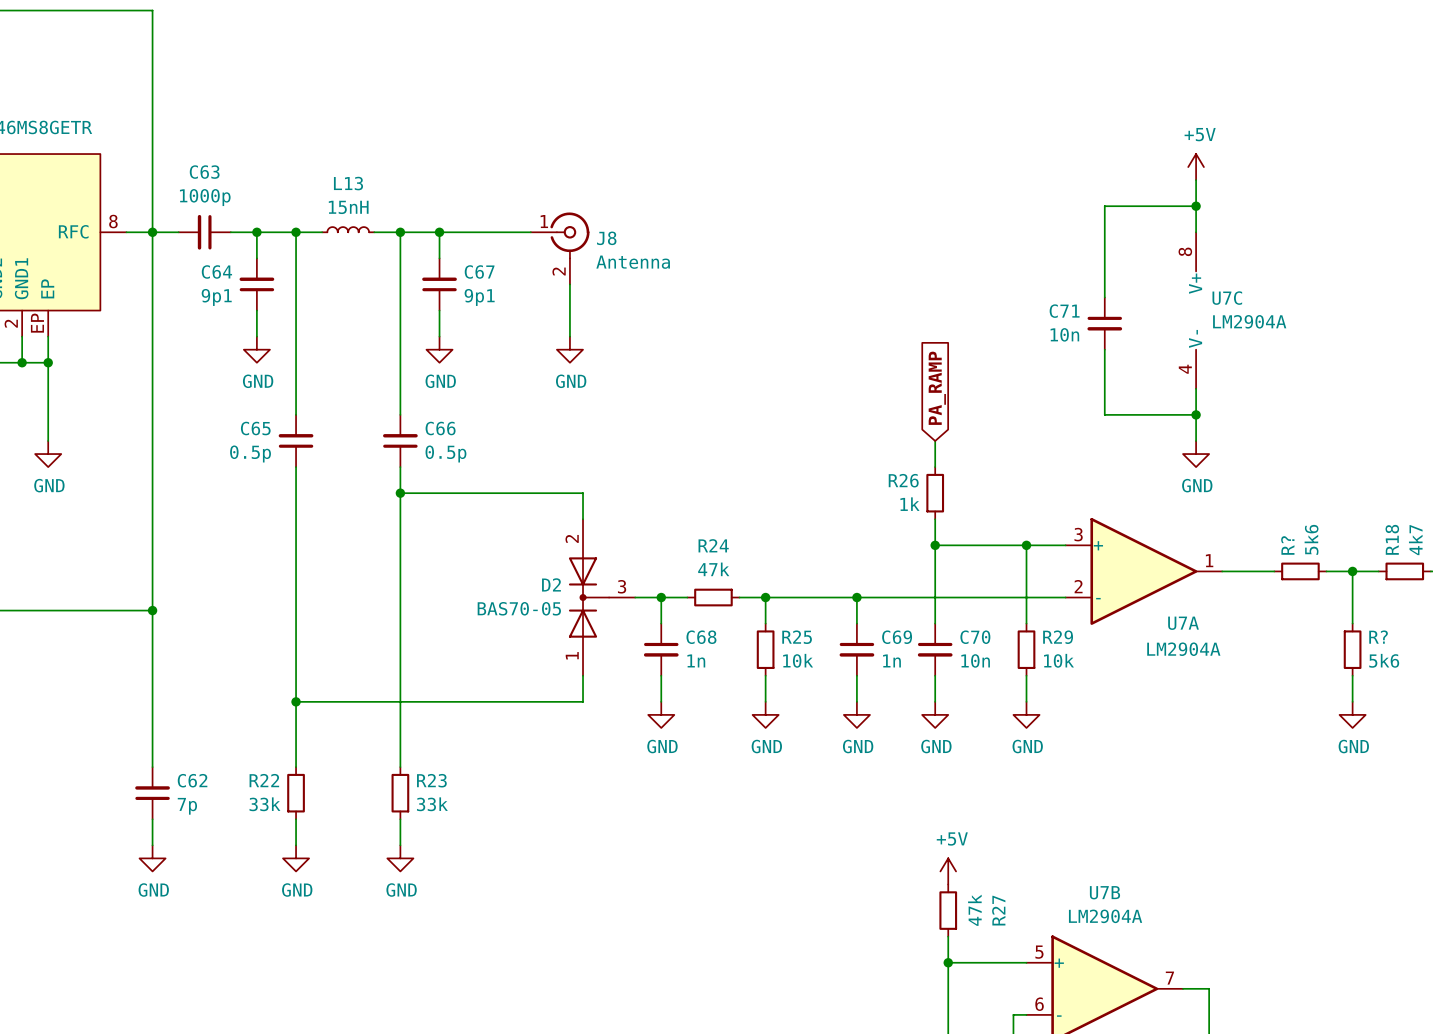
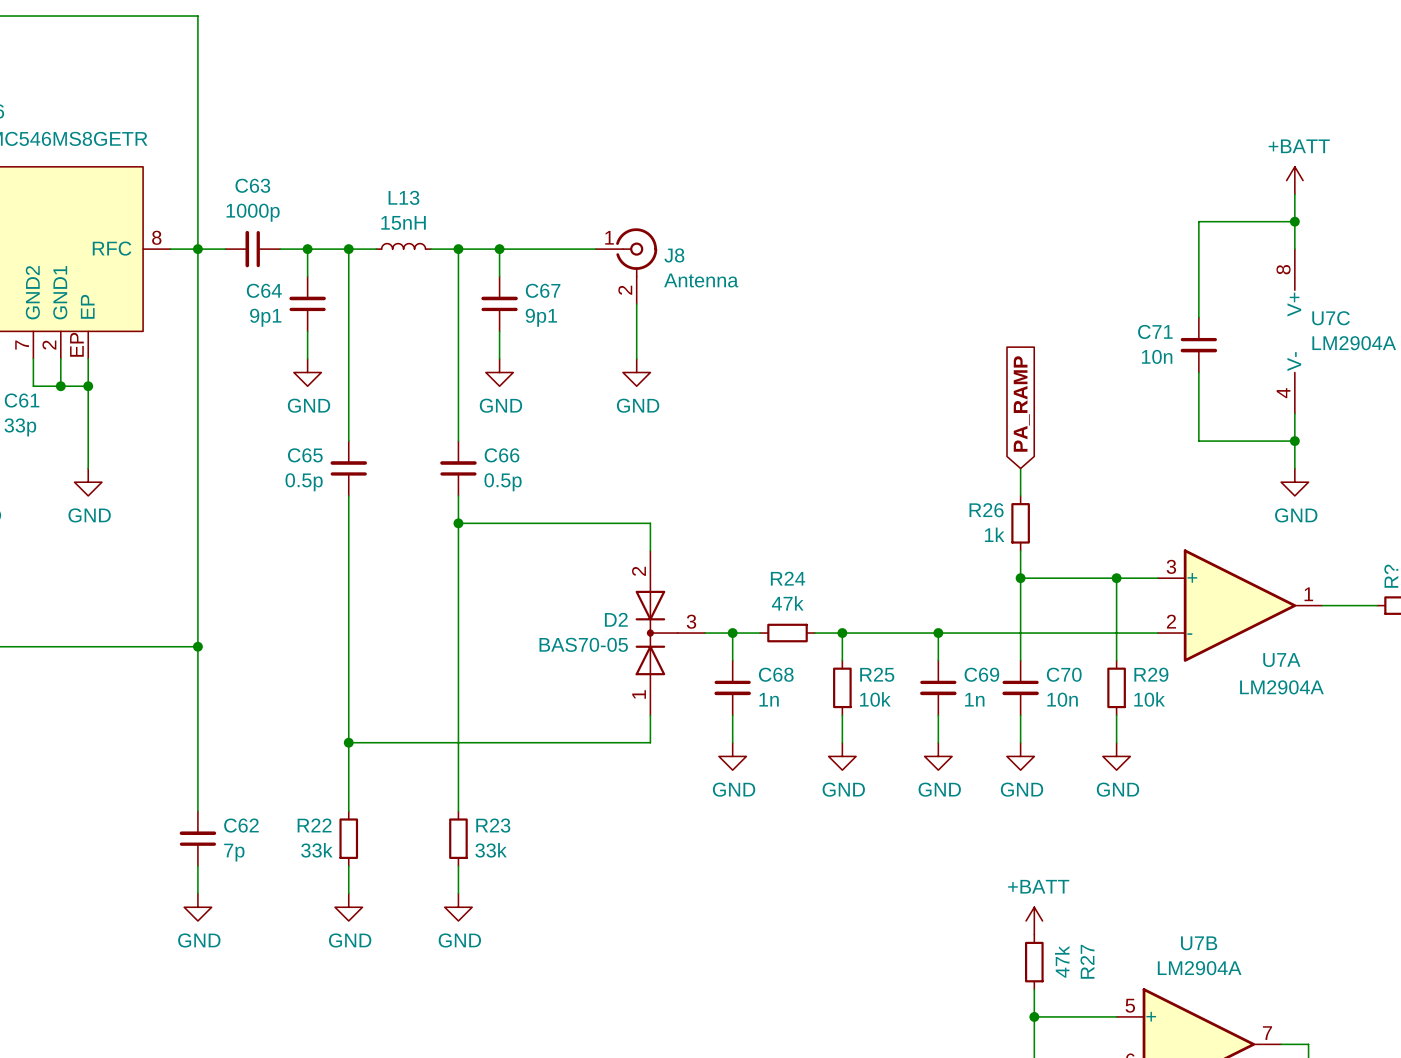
power symbol: +5V (1196, 167) -> +BATT (1294, 180)
power symbol: +5V (948, 871) -> +BATT (1034, 920)

